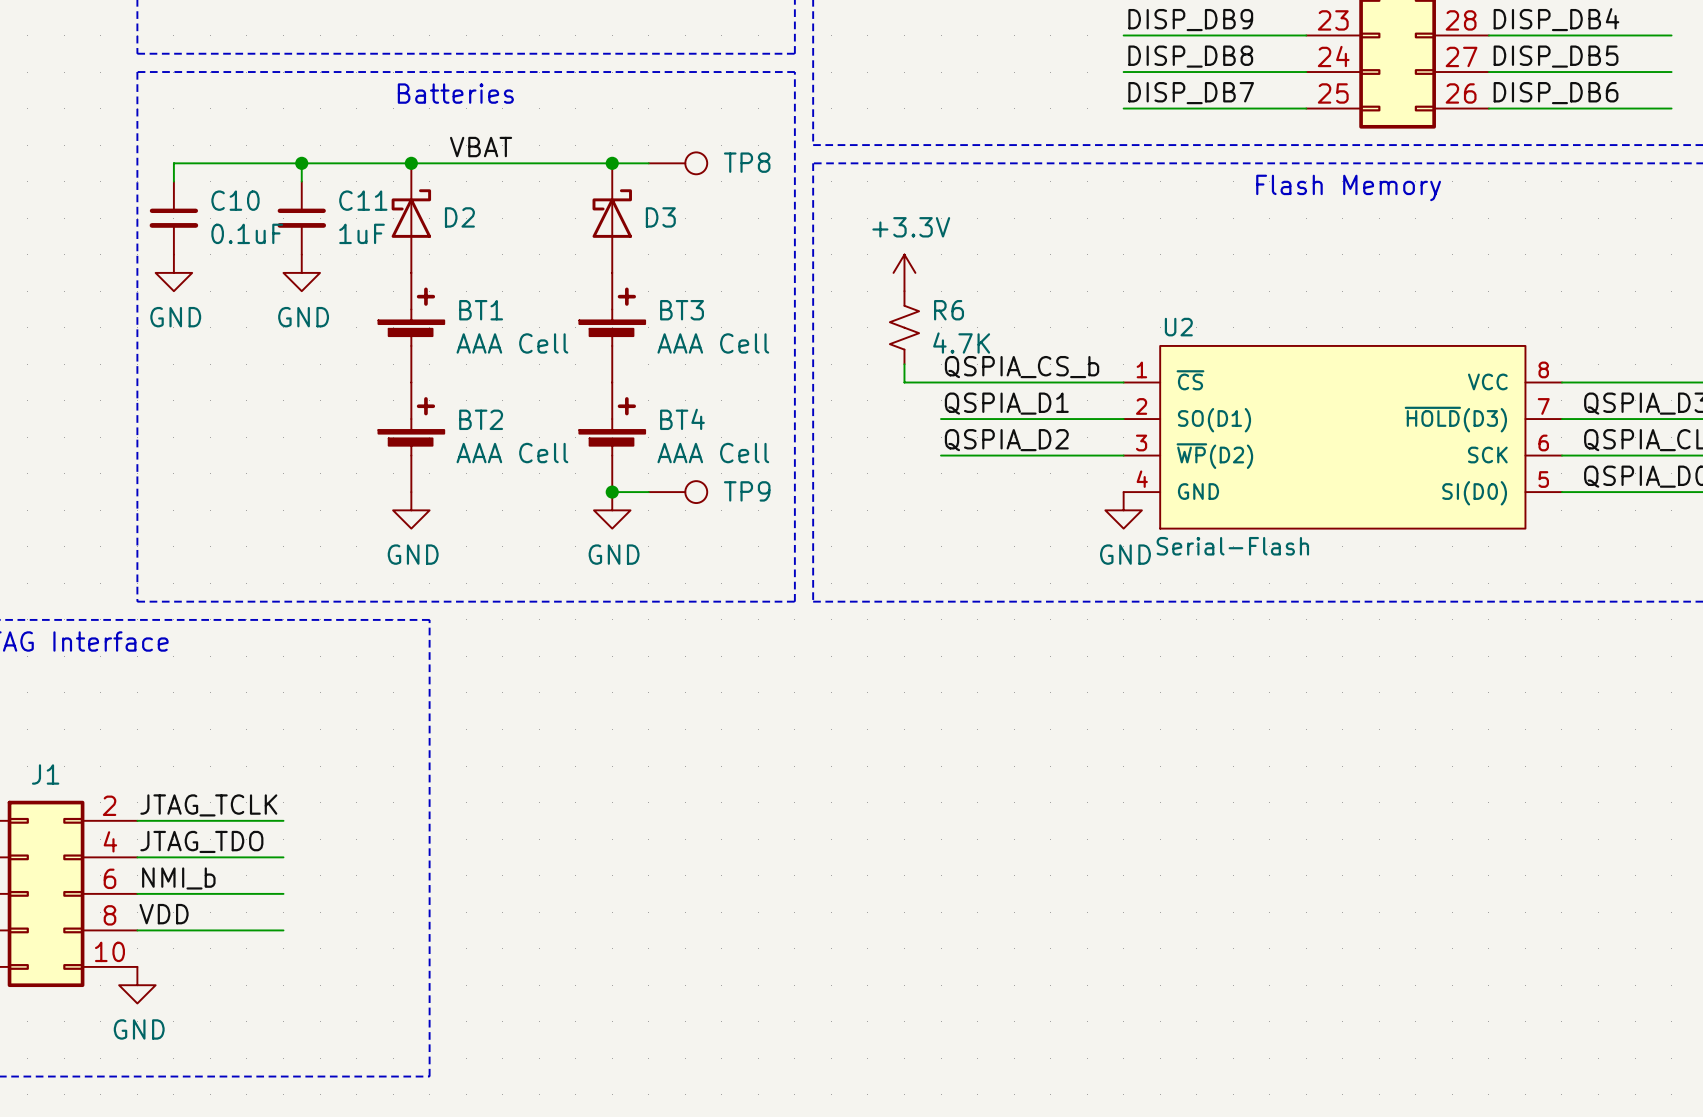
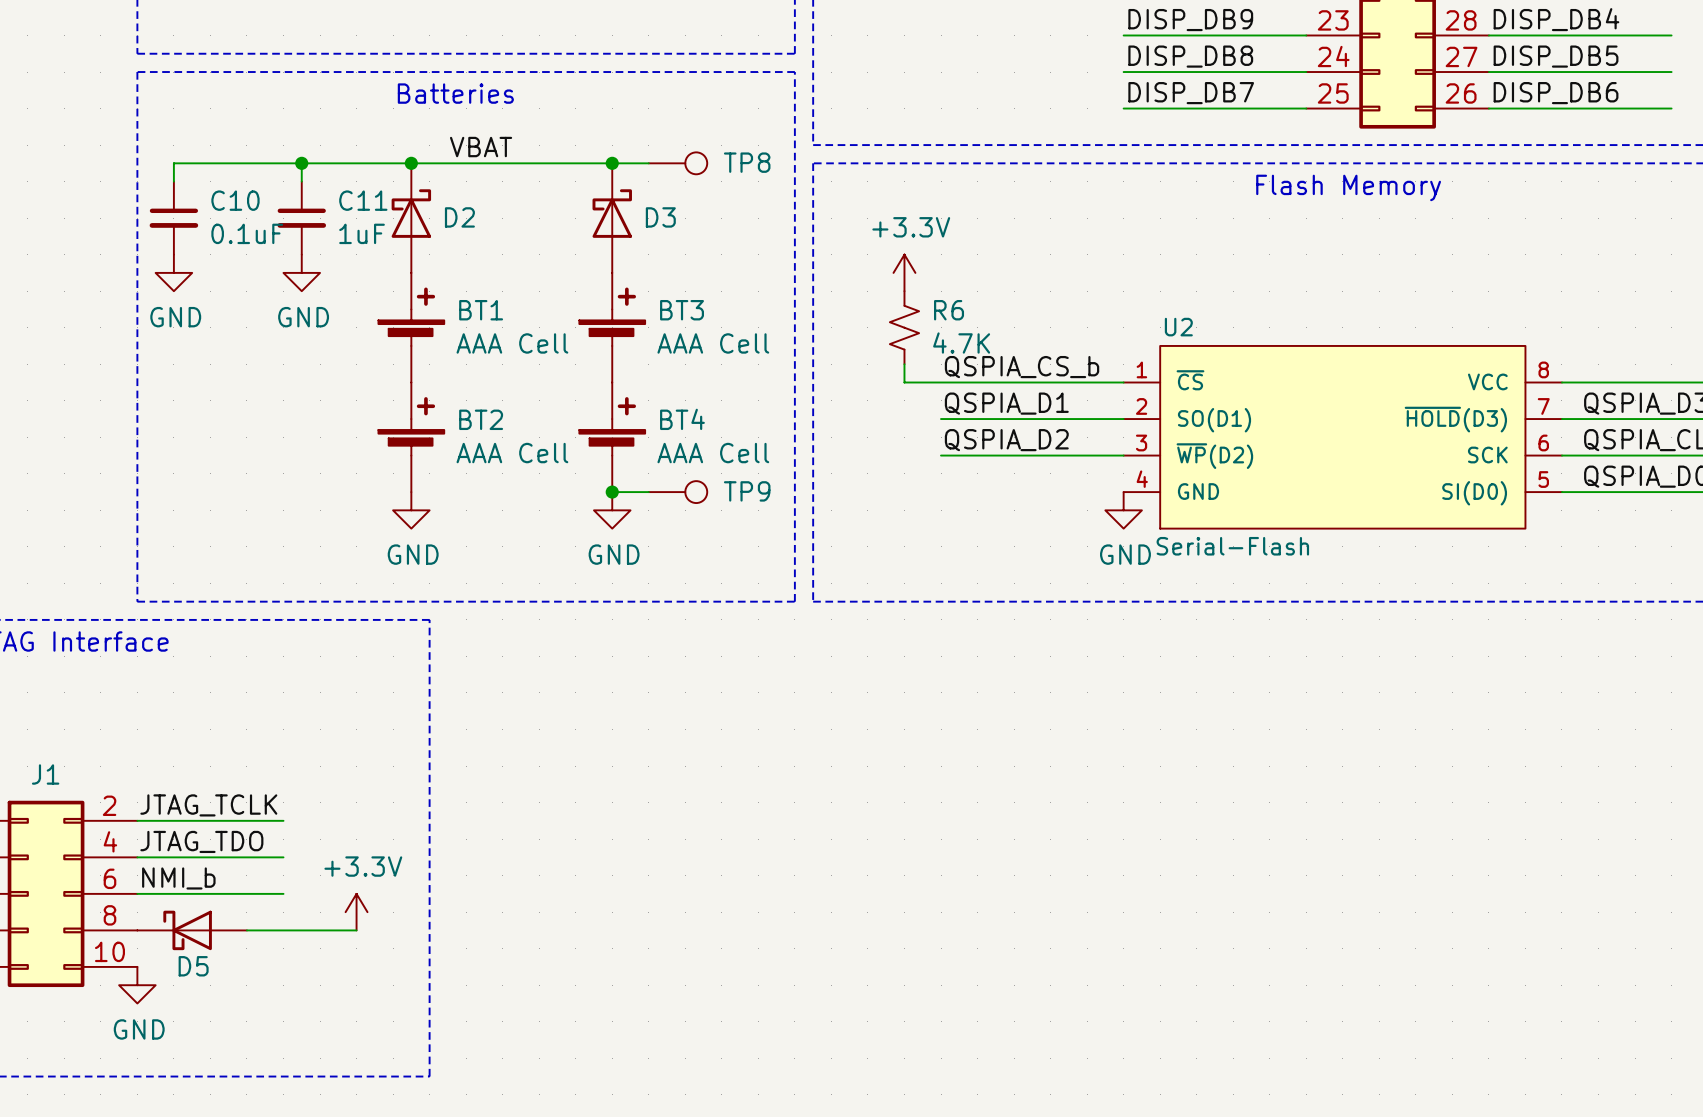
power symbol: none -> +3.3V (356, 912)
label: VDD (164, 914) -> none
D5: none -> (192, 930)
wire: none -> (283, 930) (356, 930)

